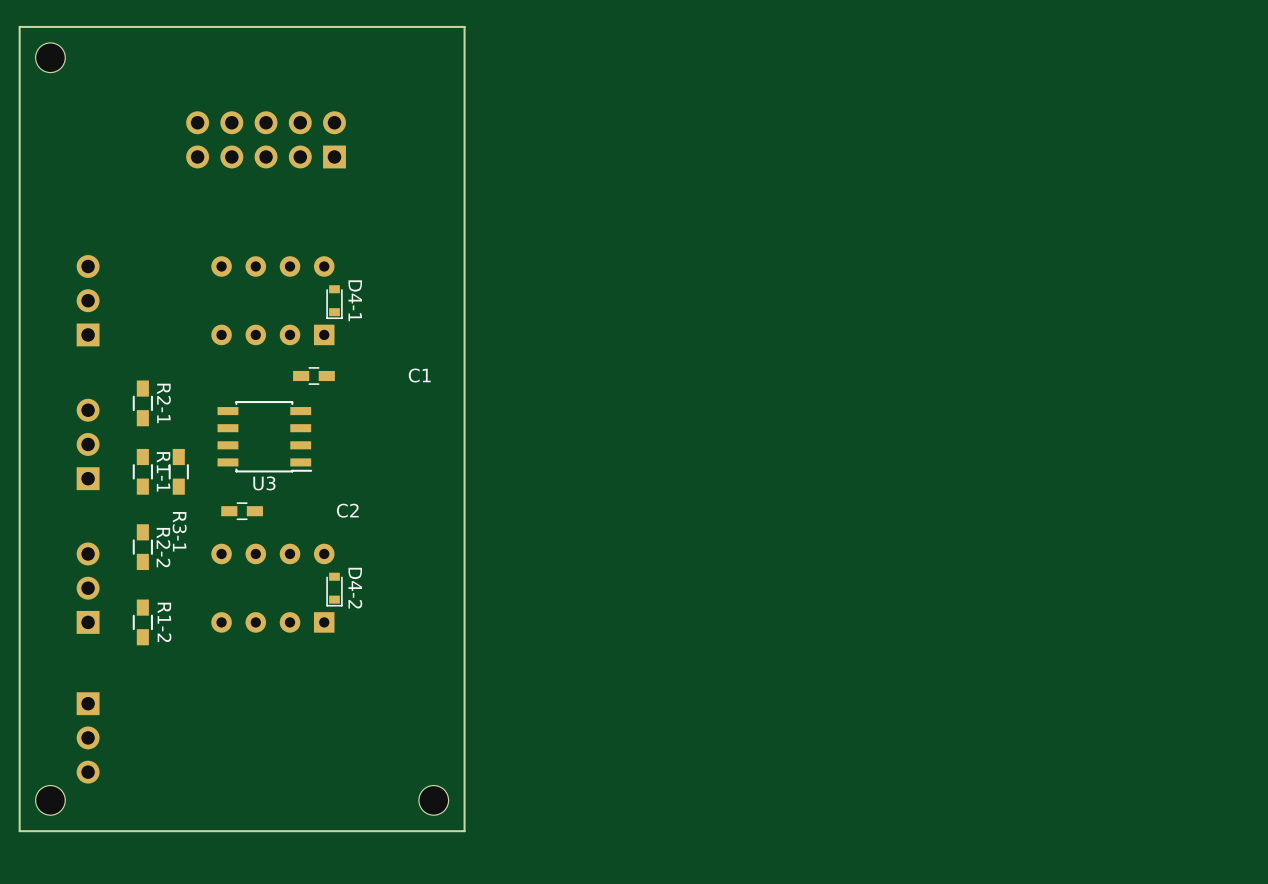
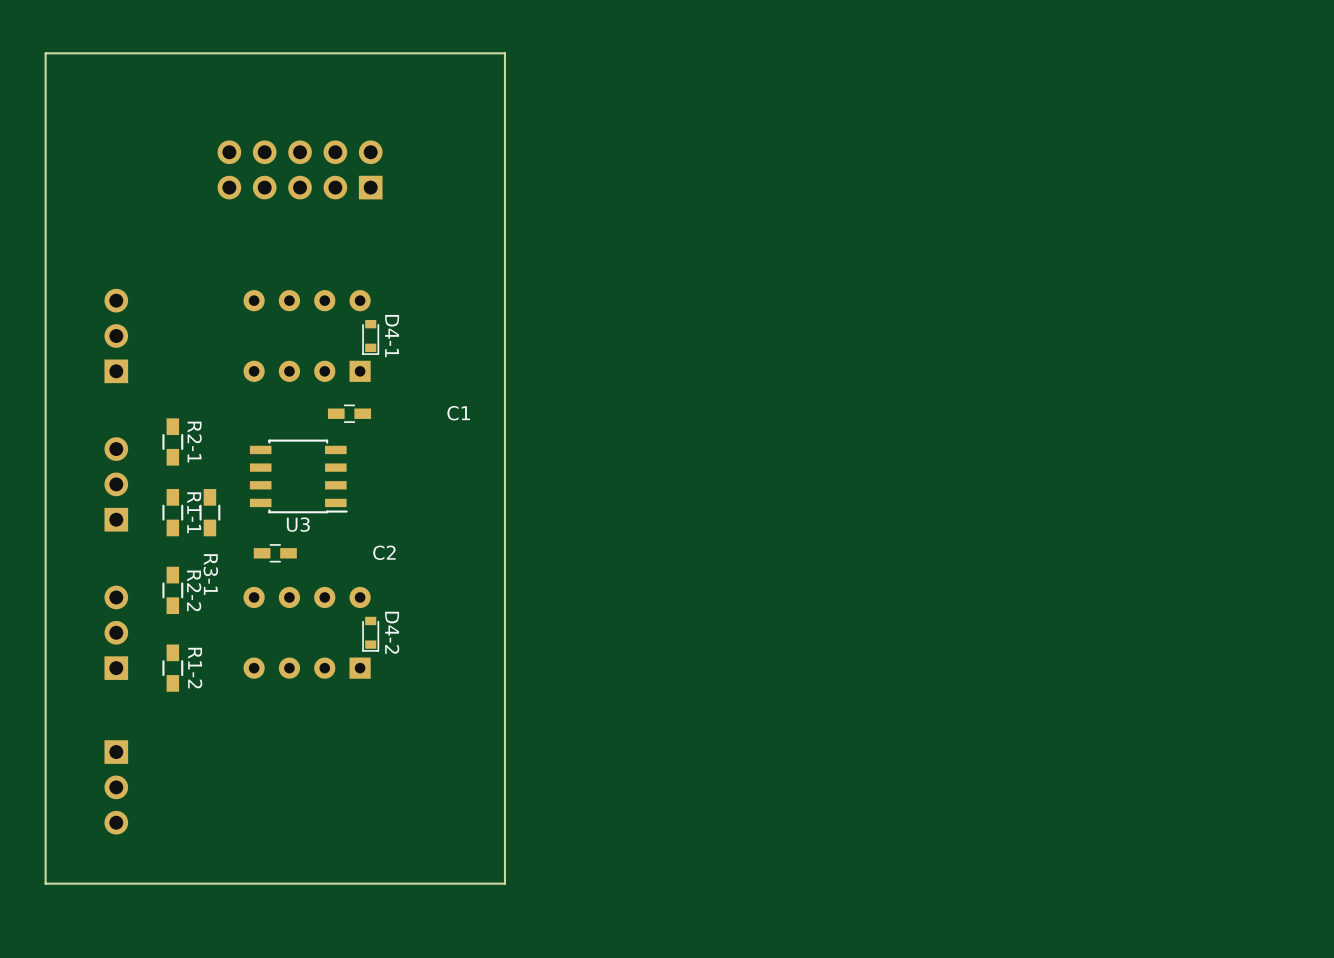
part: (50, 57) -> none
part: (50, 800) -> none
part: (433, 800) -> none

